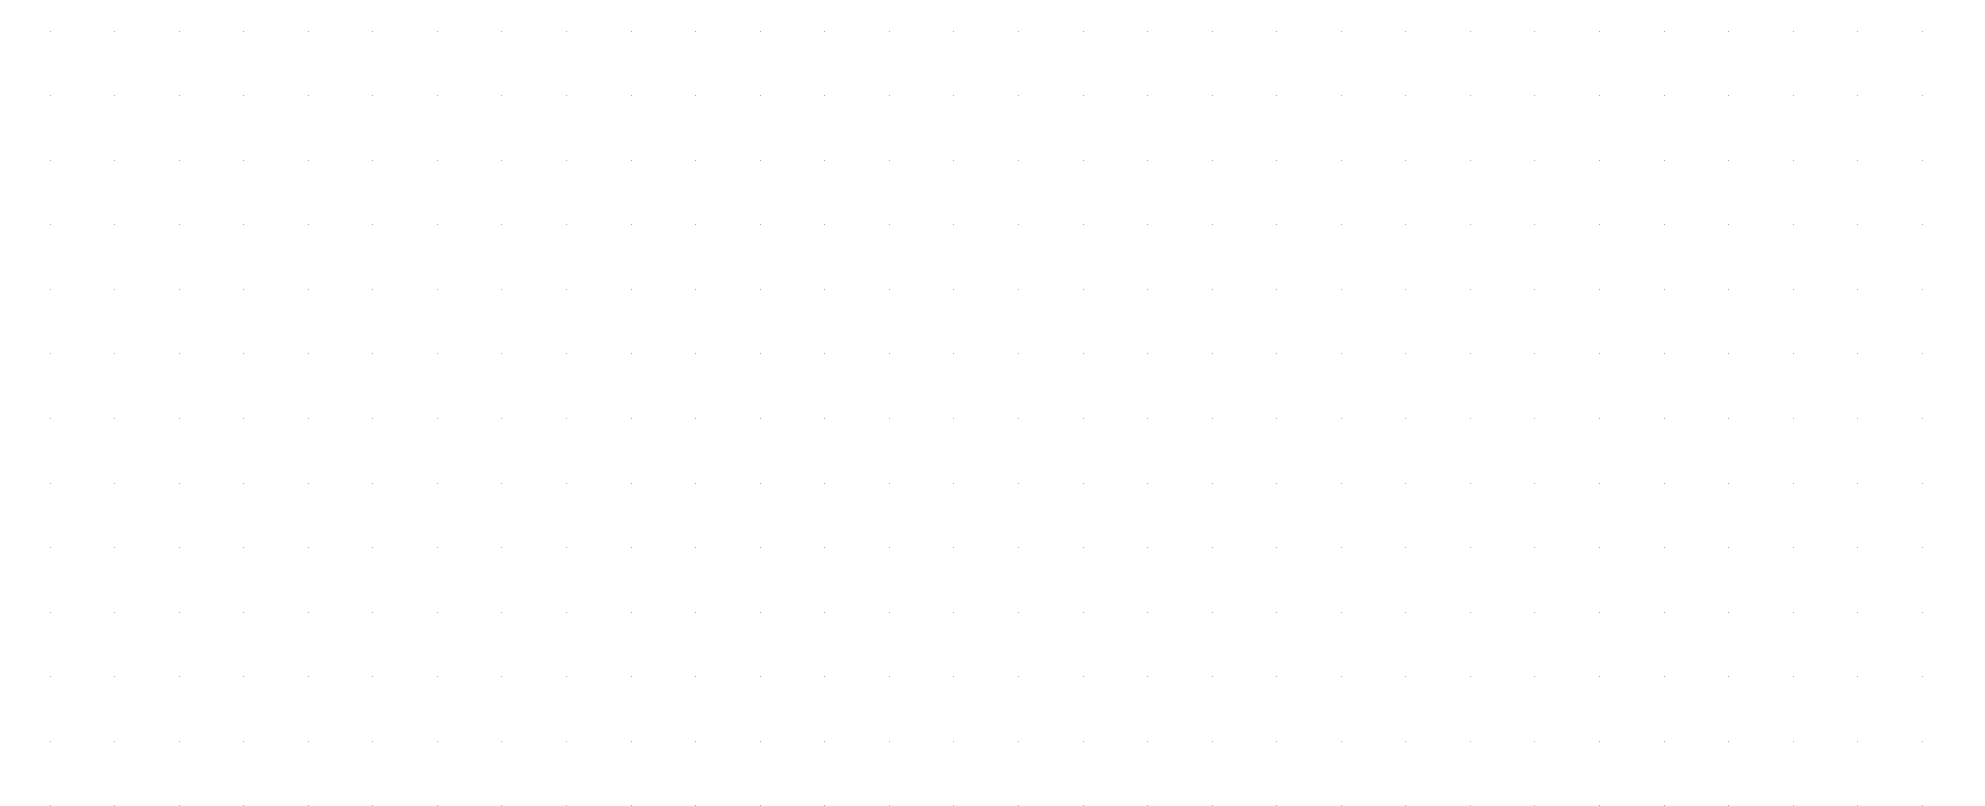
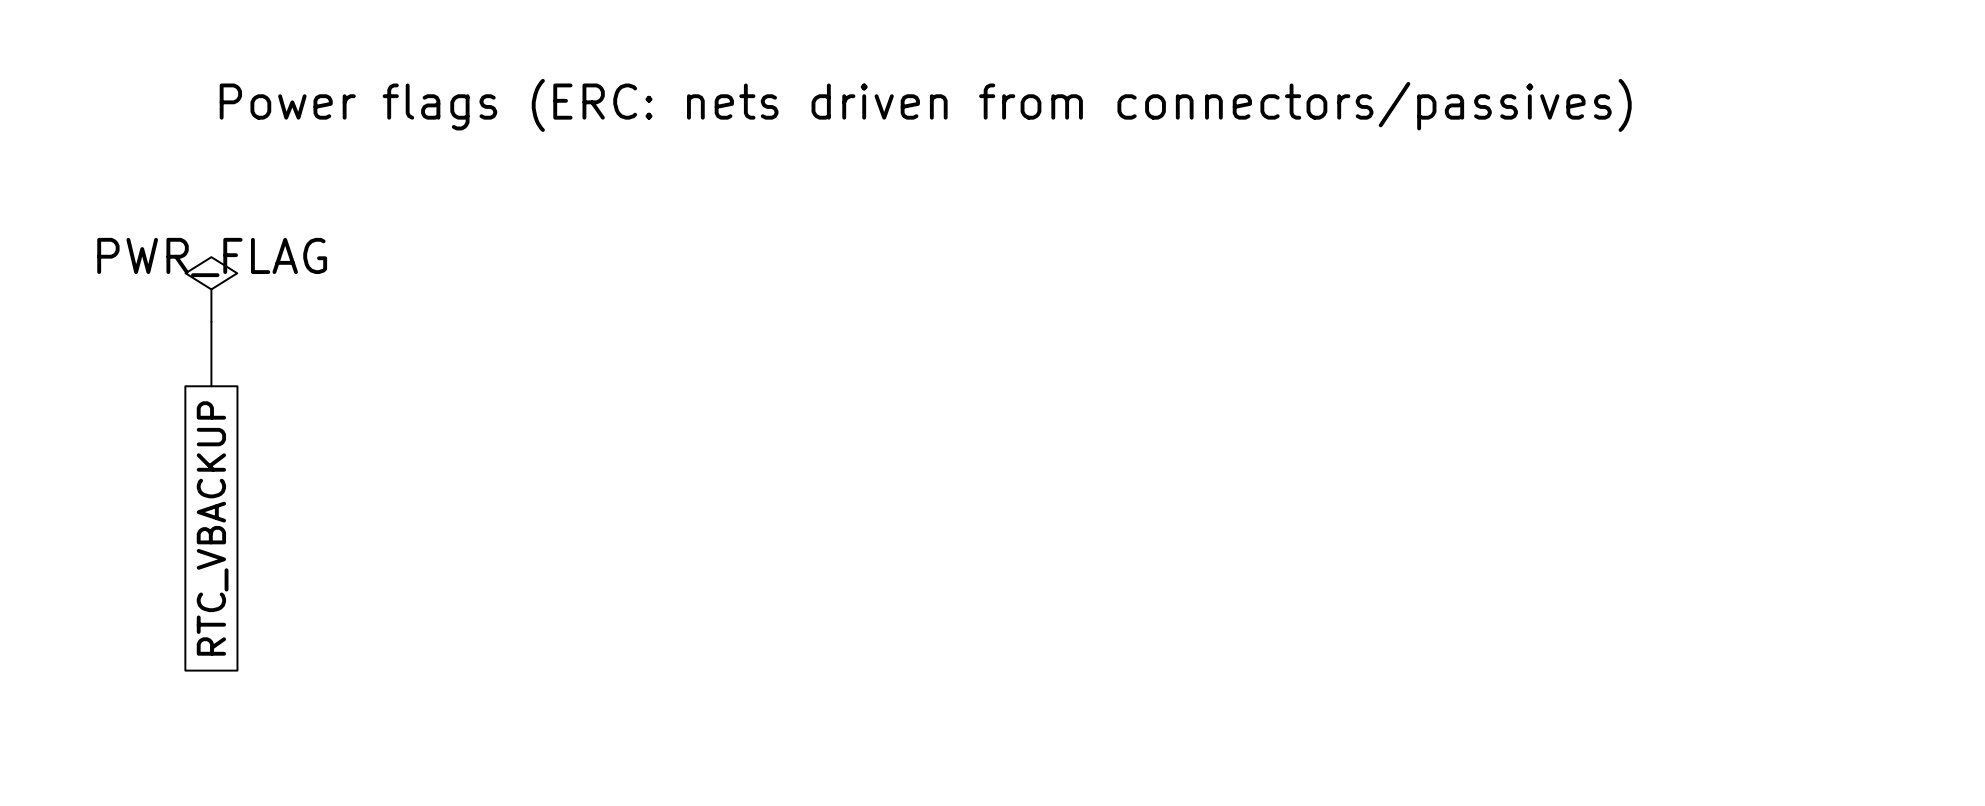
text: none -> Power flags (ERC: nets driven from connectors/passives) (925, 105)
power symbol: none -> PWR_FLAG (211, 289)
wire: none -> (211, 321) (211, 386)
global label: none -> RTC_VBACKUP (212, 528)

